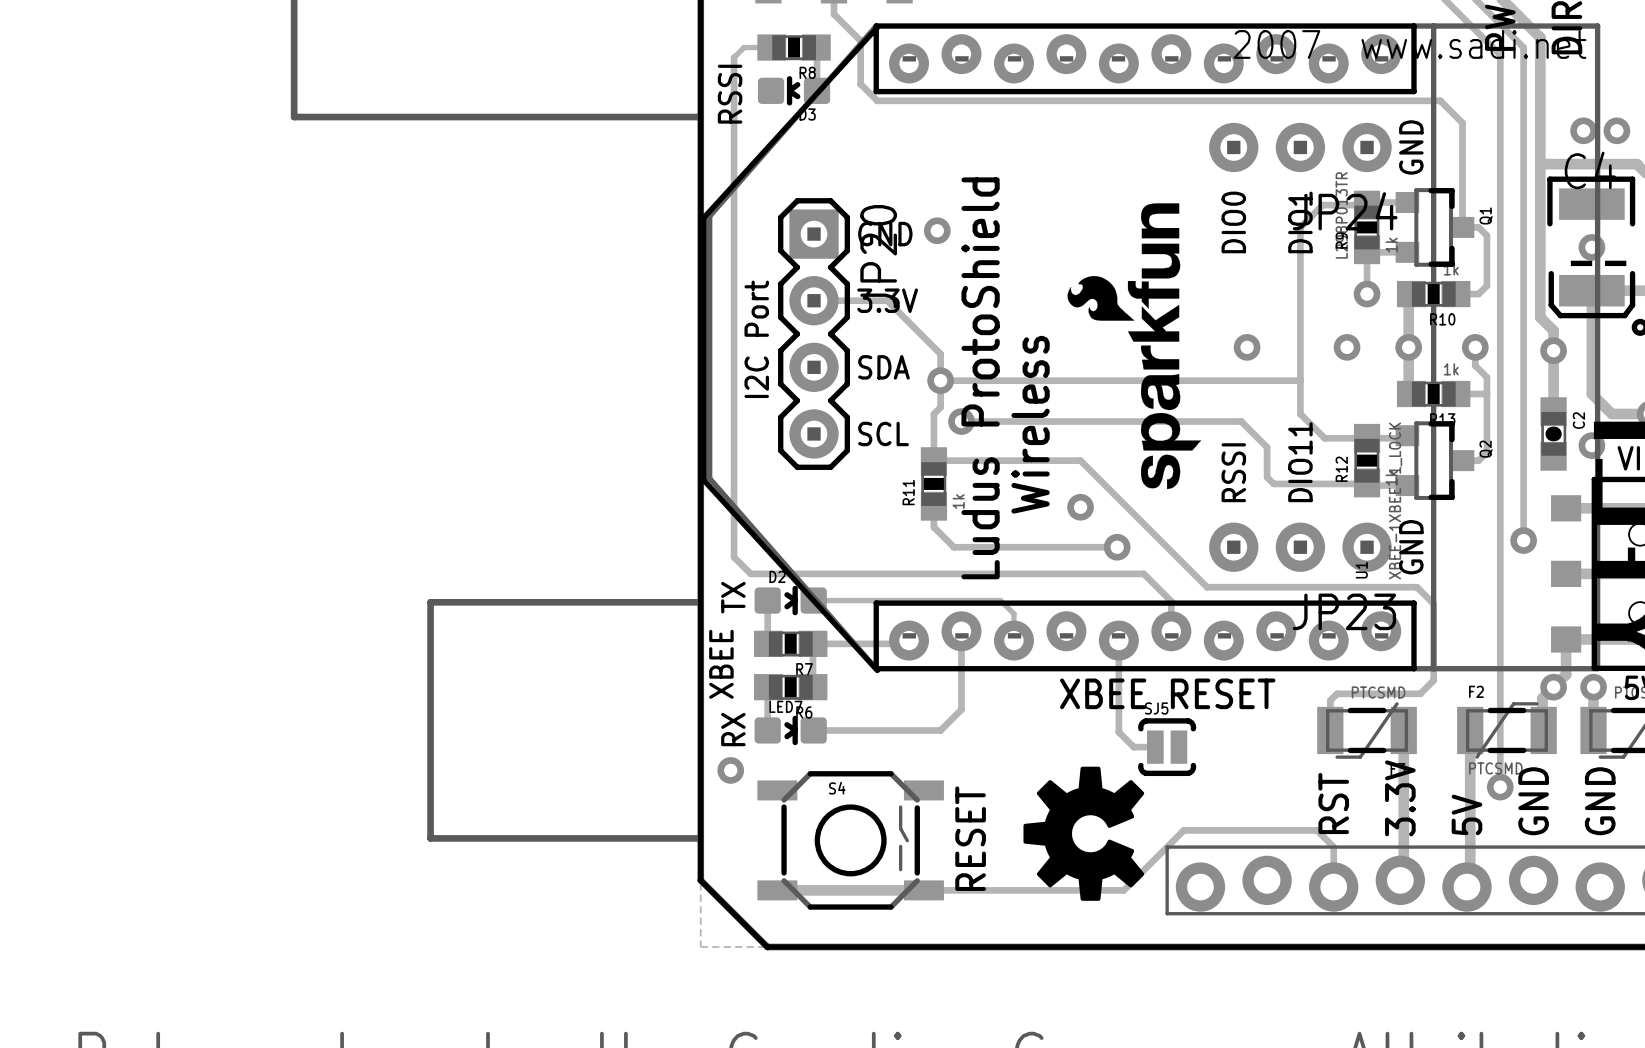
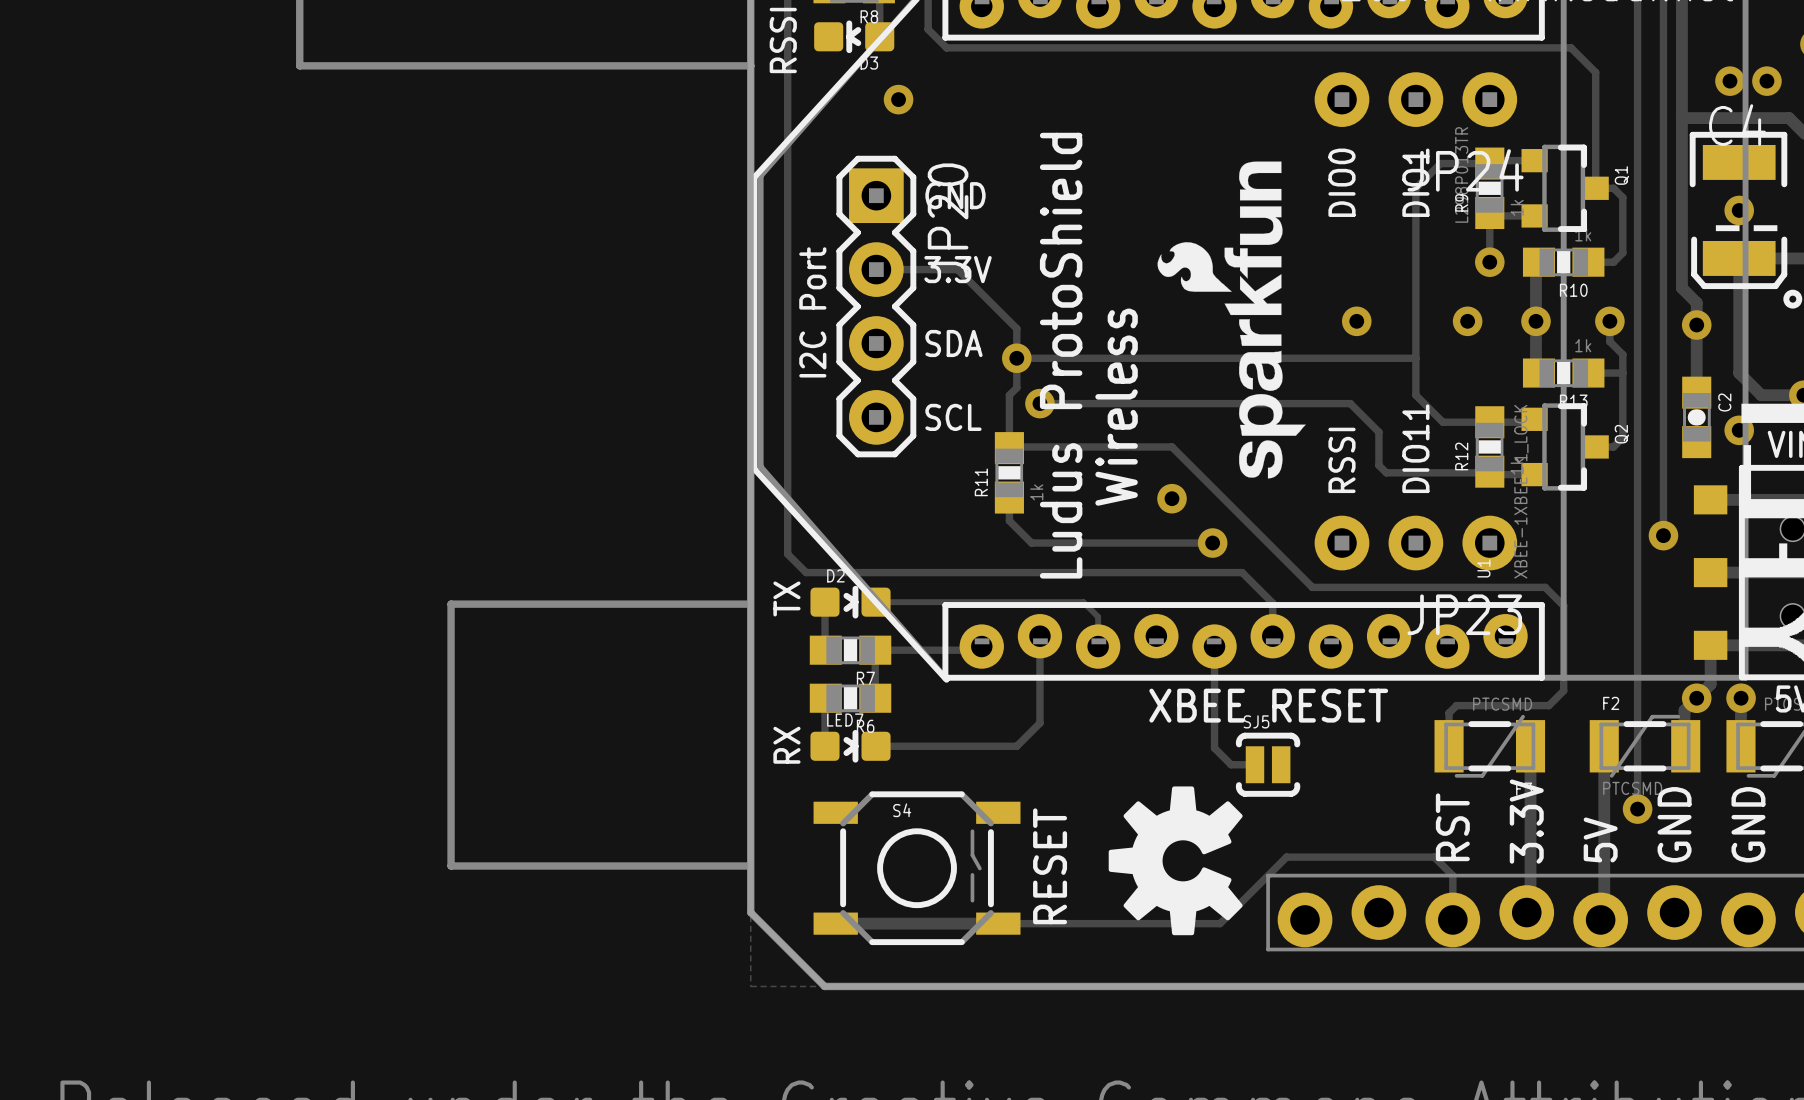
text: GND (1411, 147) -> none
via position: (937, 230) -> (898, 99)
text: GND (1411, 547) -> none
text: XBEE (721, 664) -> none
via: (730, 770) -> none

